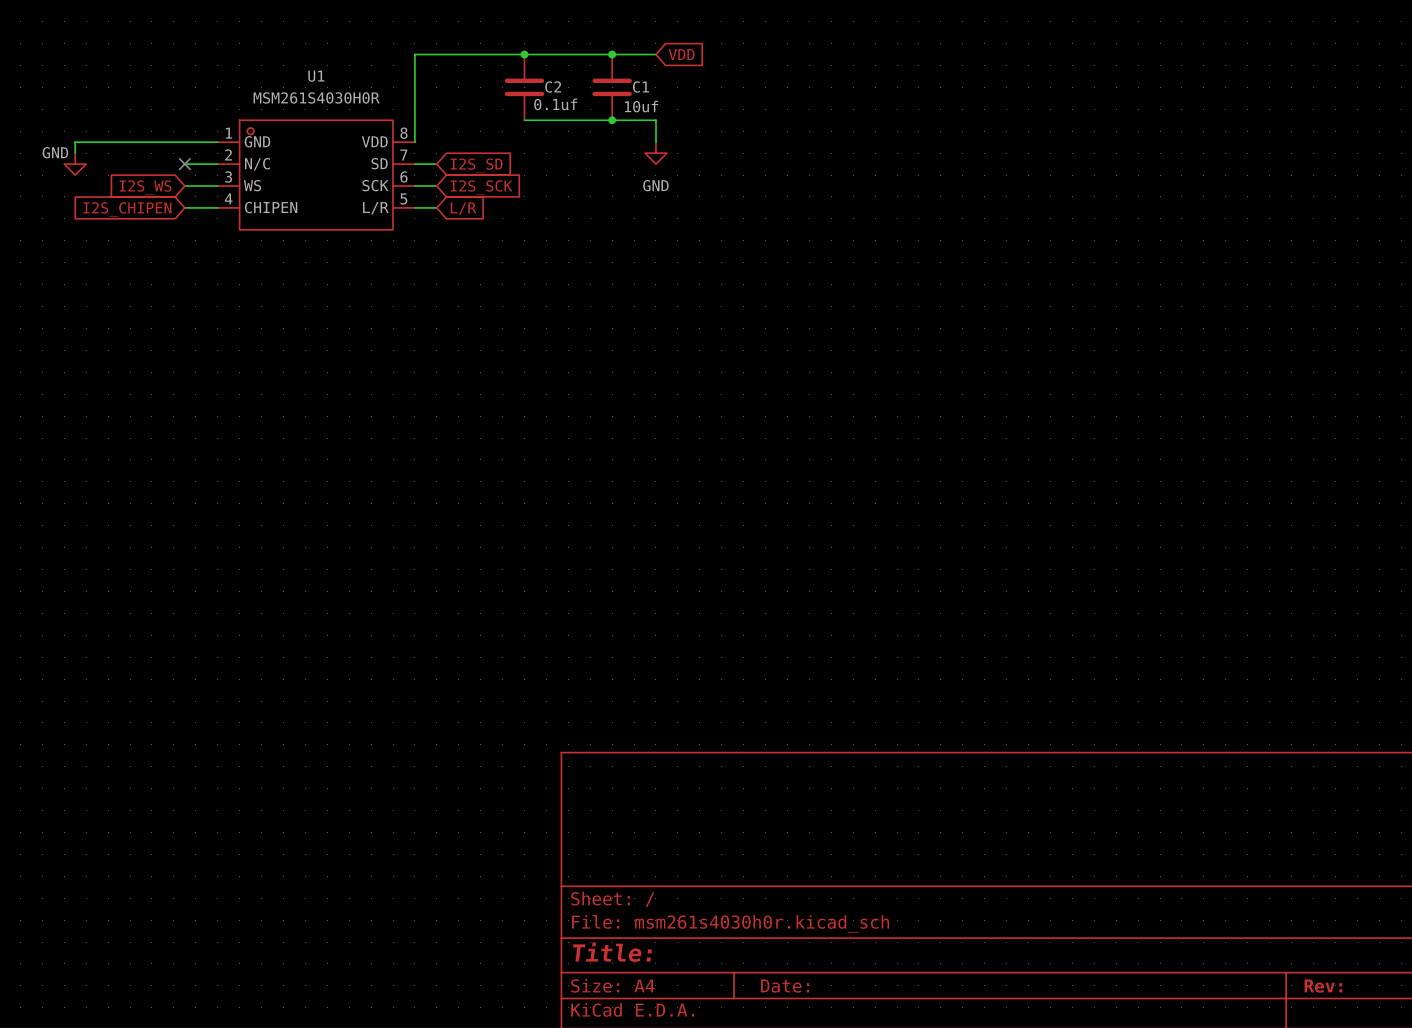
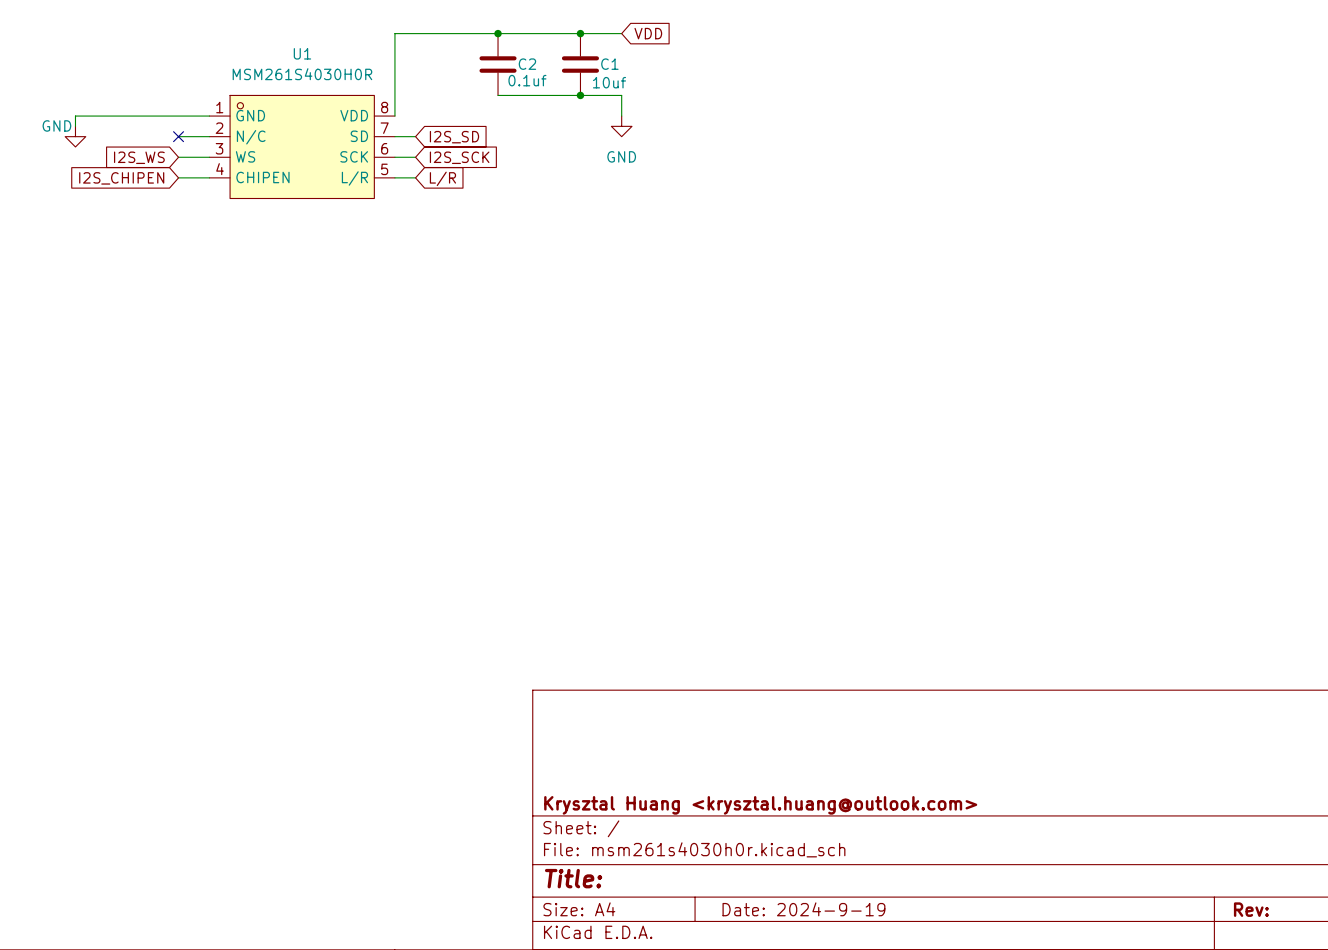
title block: none -> Krysztal Huang <krysztal.huang@outlook.com> (760, 805)
title block: Date: (785, 986) -> Date: 2024-9-19 (803, 909)

